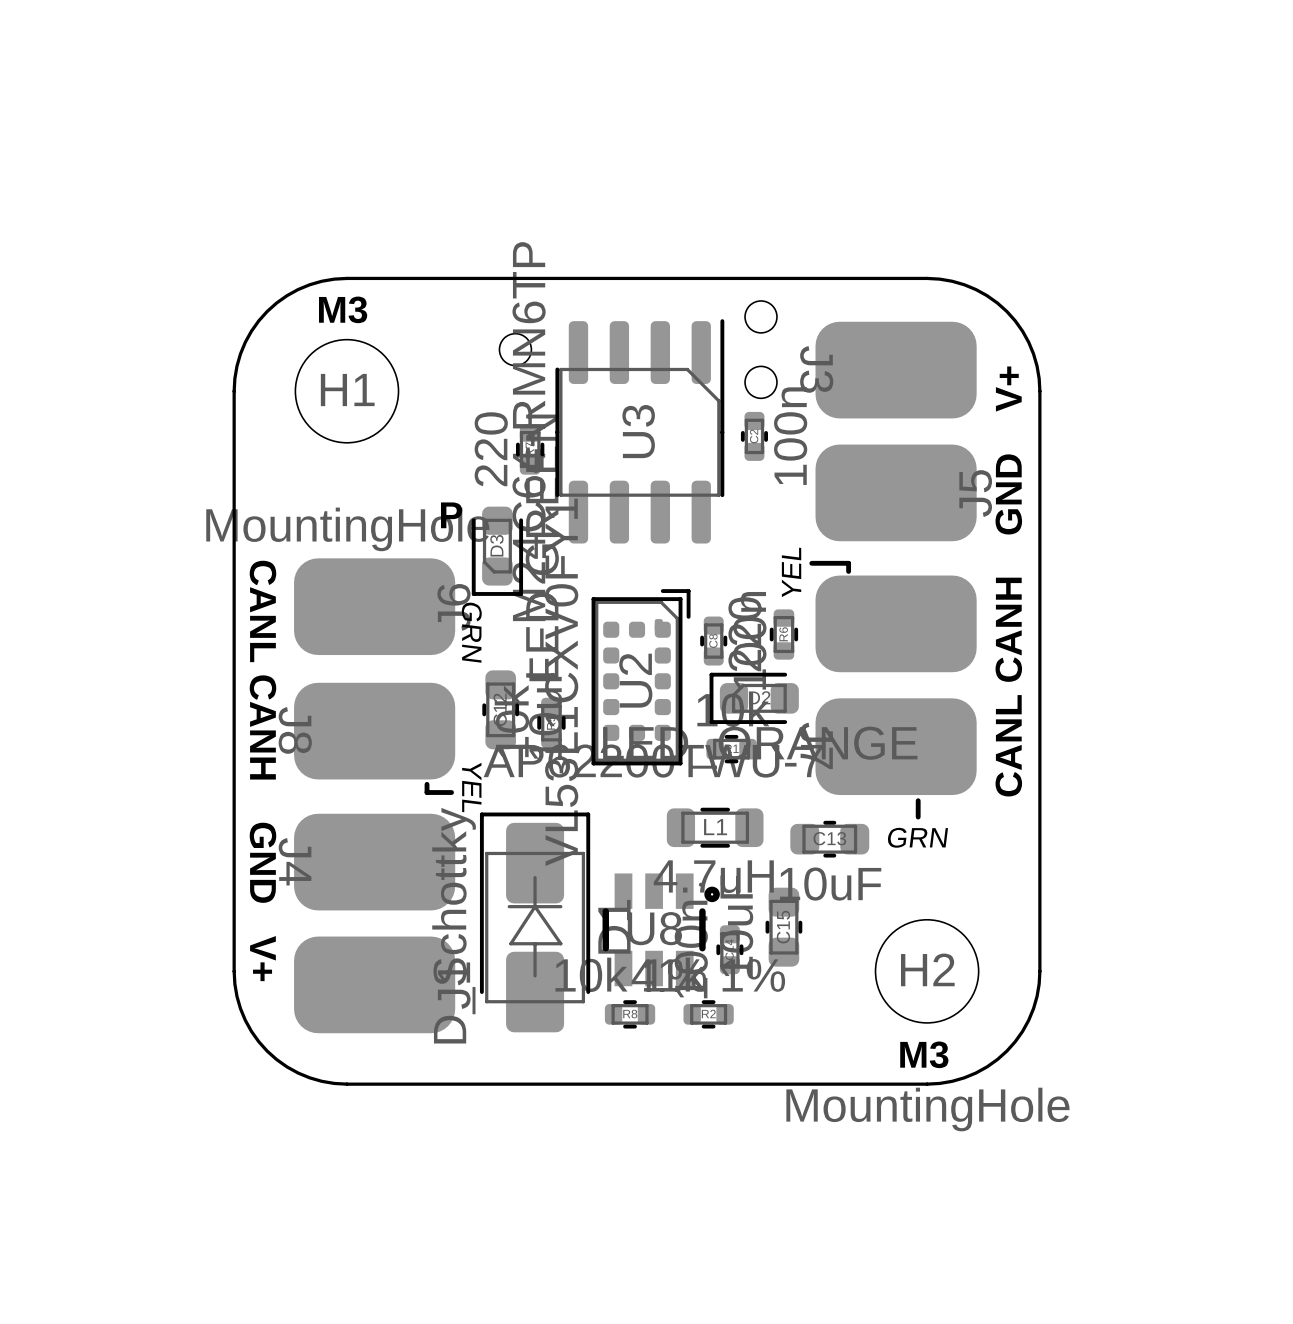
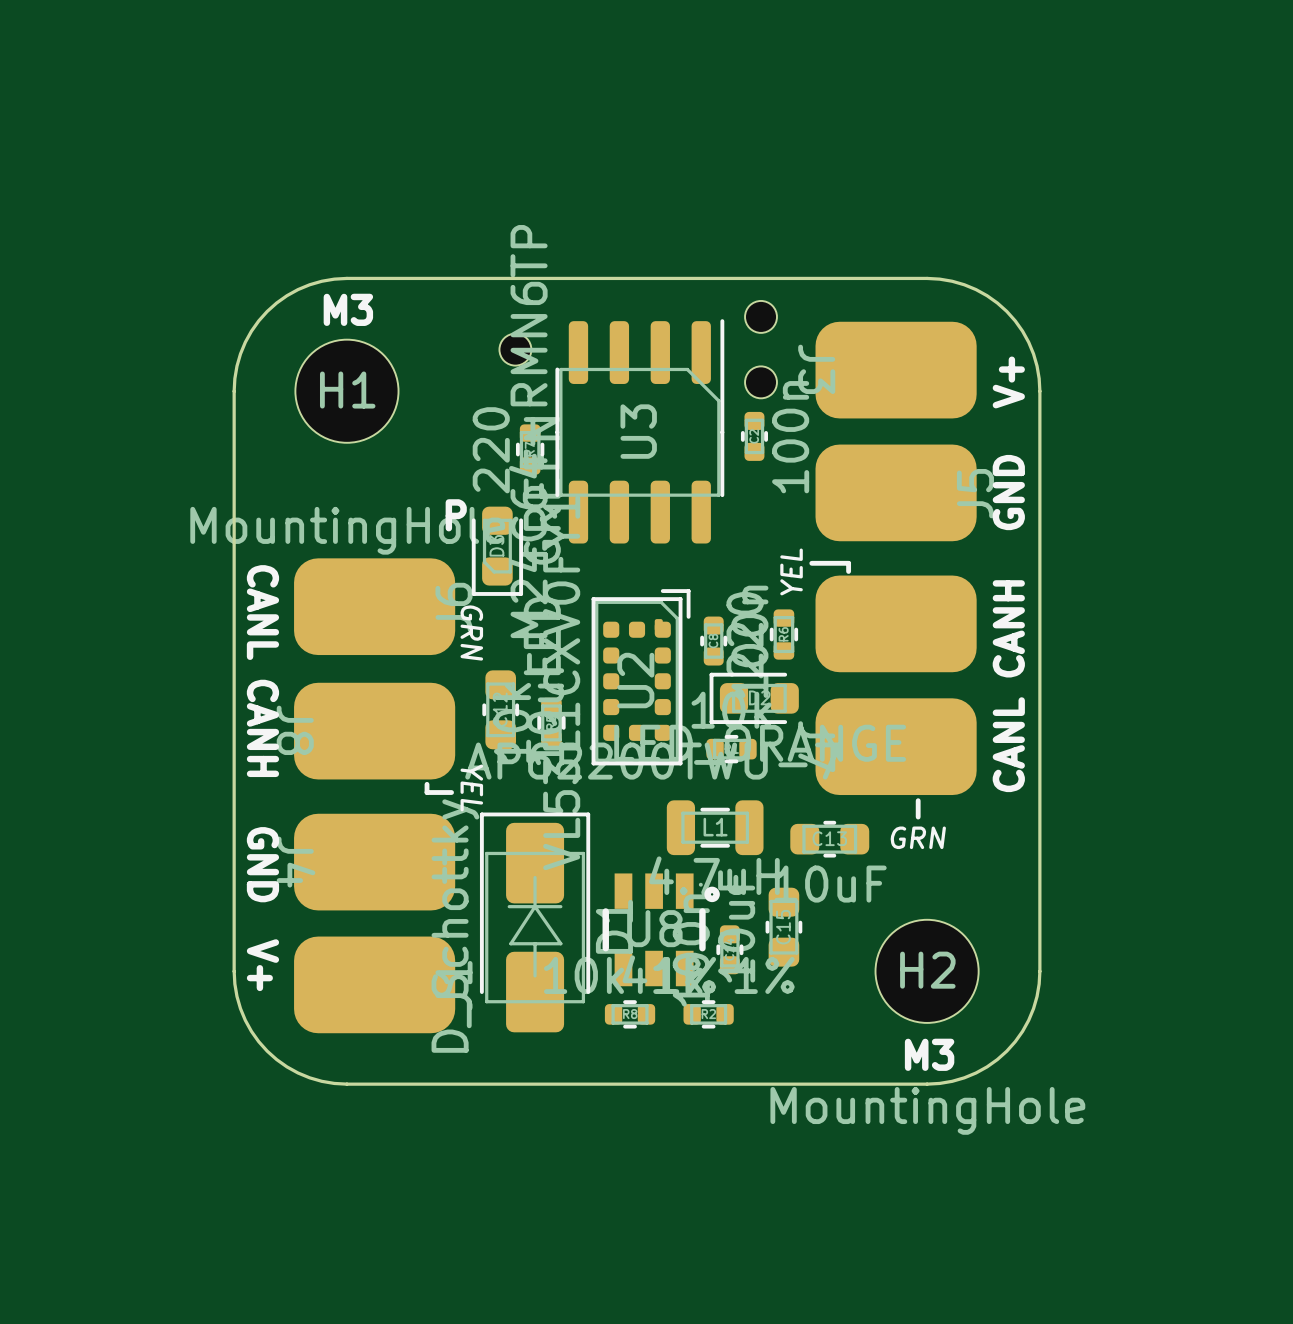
L1 footprint: [666, 807, 764, 848] -> [666, 800, 764, 856]

